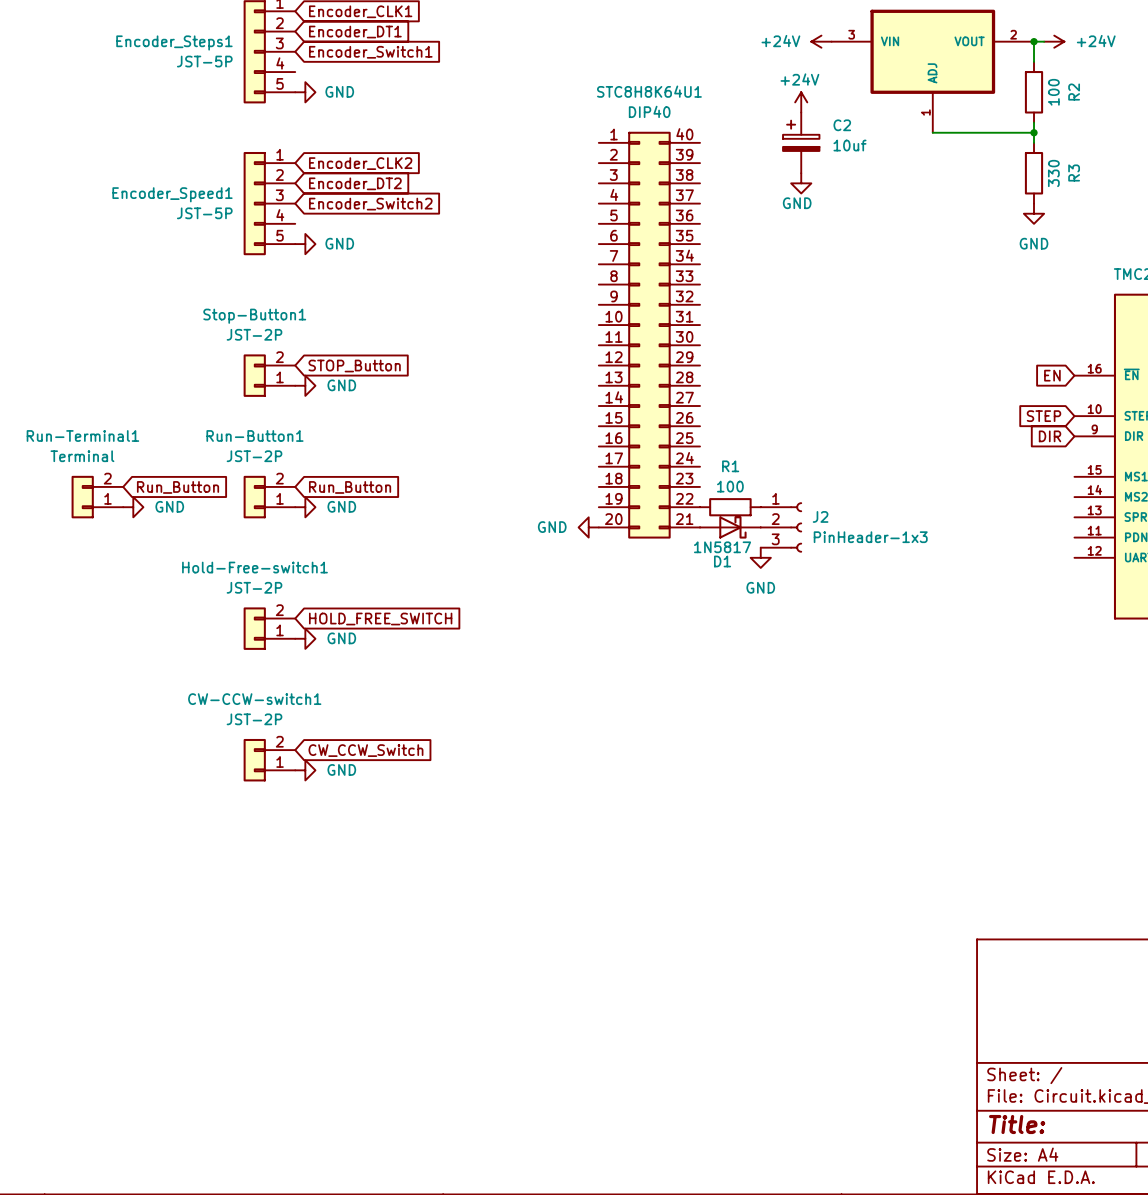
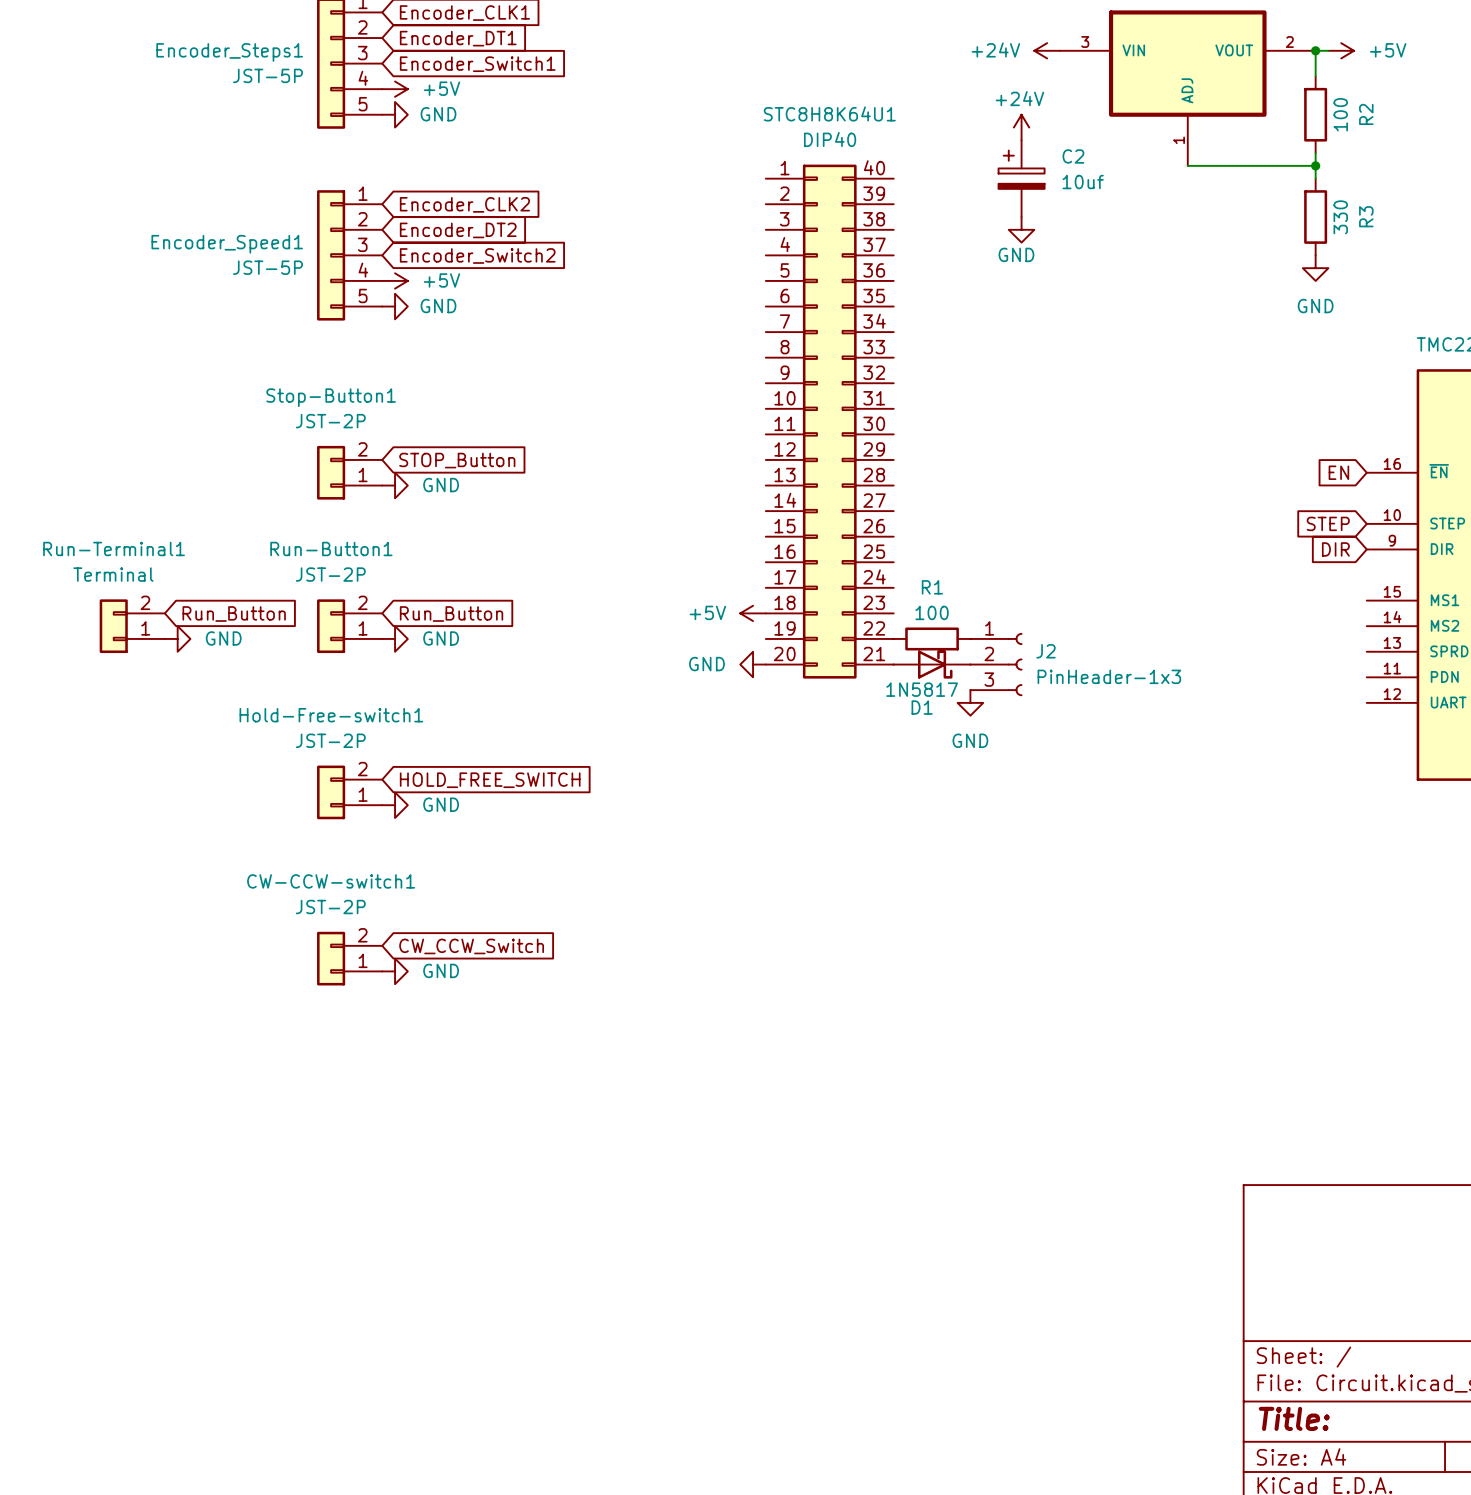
power symbol: +24V (1054, 41) -> +5V (1341, 50)
power symbol: none -> +5V (395, 89)
power symbol: none -> +5V (395, 280)
power symbol: none -> +5V (753, 613)

